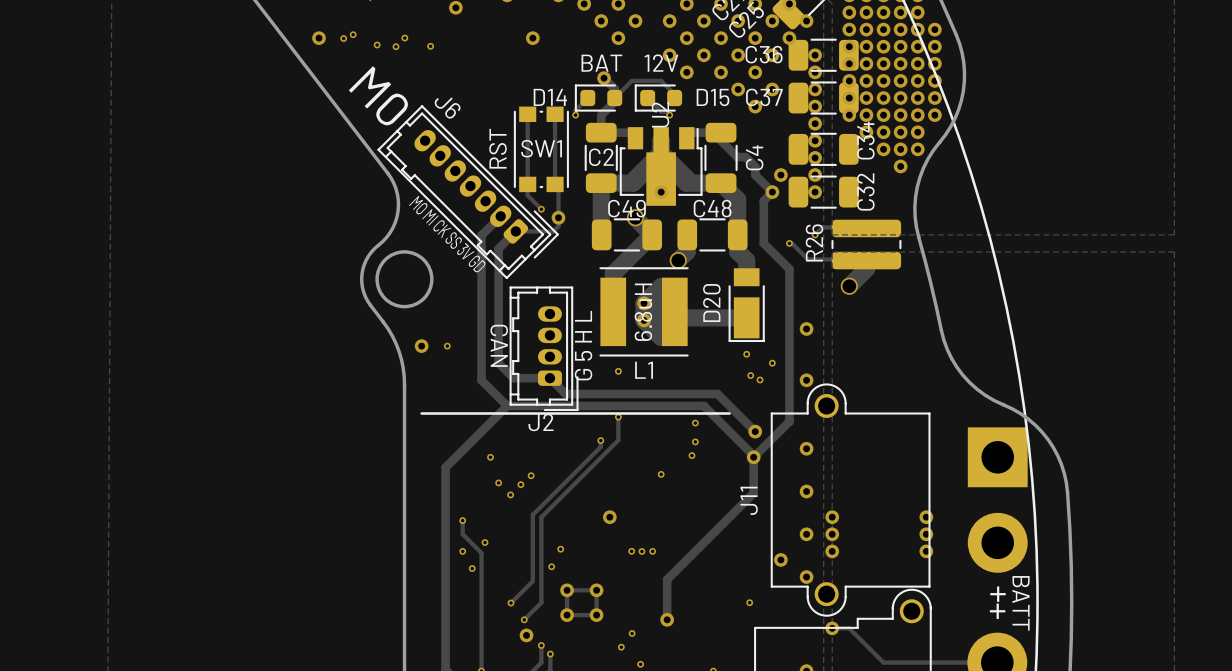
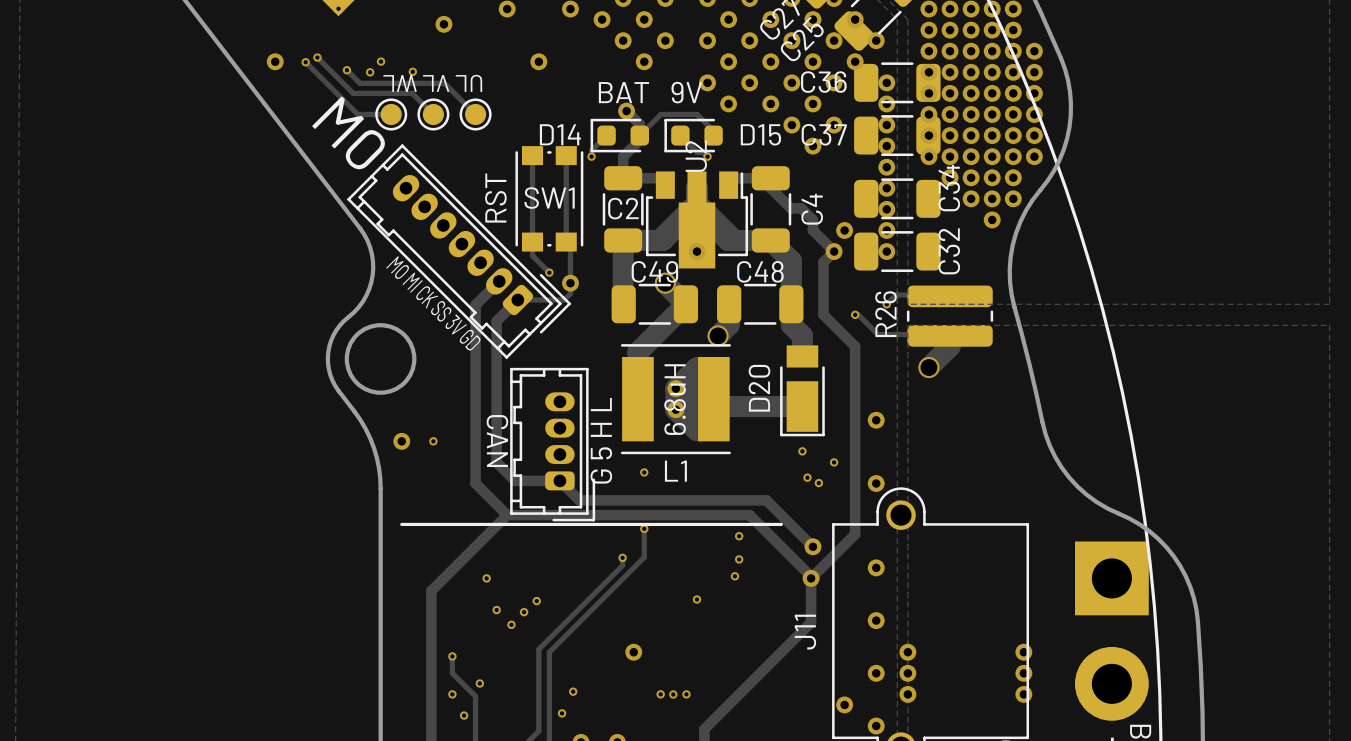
track: none -> (317, 57) (353, 93) (412, 93) (433, 114)
track: none -> (305, 62) (357, 114) (391, 114)
track: none -> (346, 70) (360, 83) (444, 83) (475, 114)
text: none -> UL VL WL (432, 83)
text: 12V (661, 63) -> 9V (686, 92)
part: none -> (391, 114)
part: none -> (433, 114)
part: none -> (475, 114)
J6 name: J6 (447, 108) -> none
J2 name: J2 (541, 422) -> none

